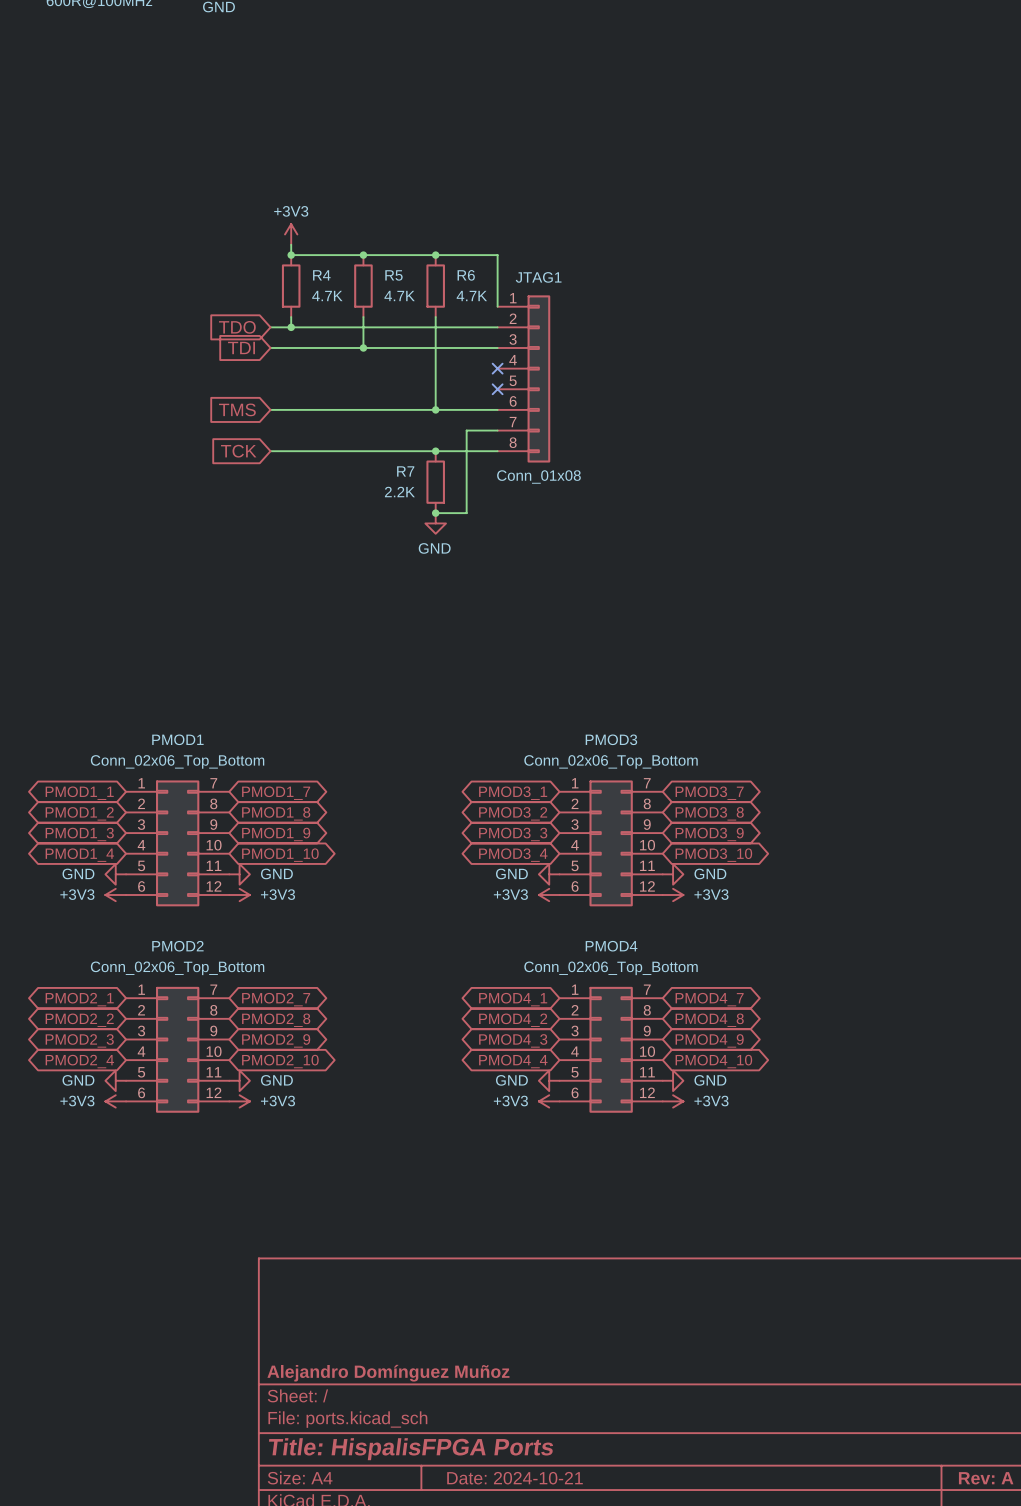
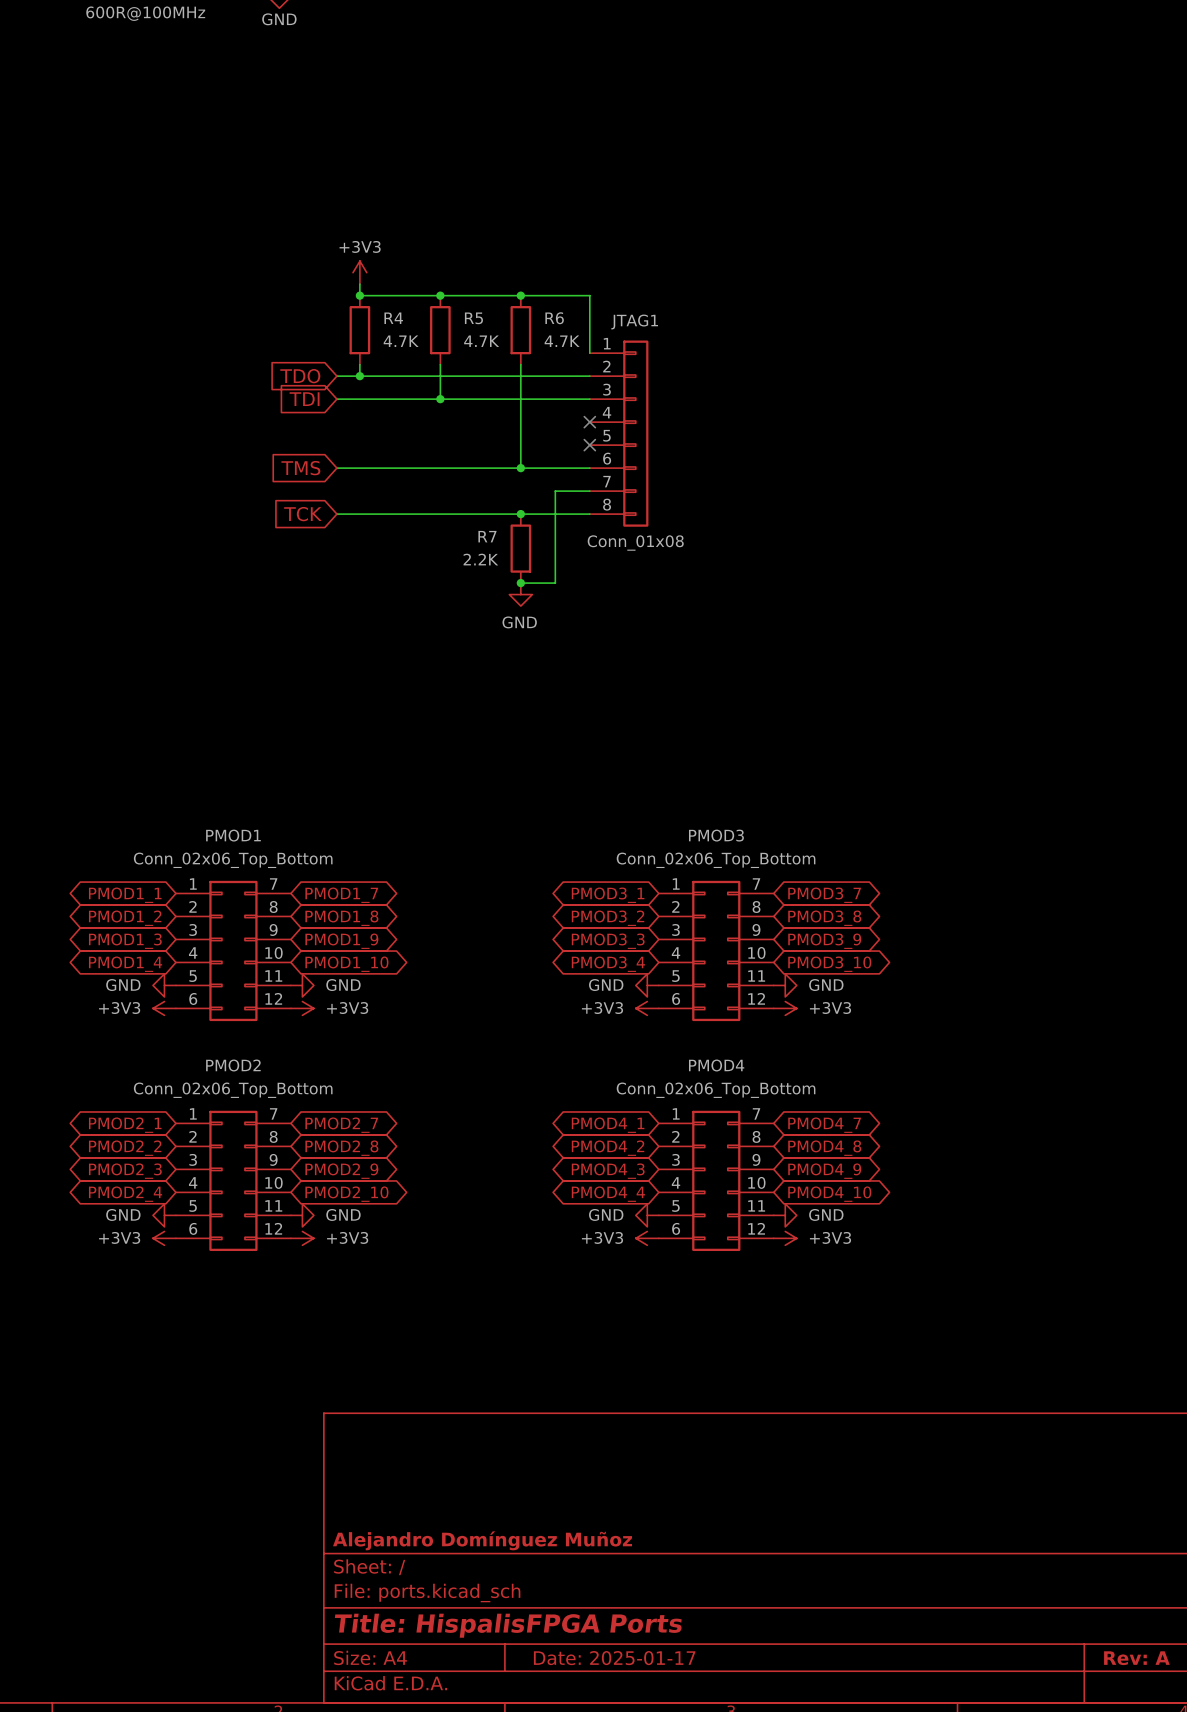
title block: Date: 2024-10-21 (515, 1478) -> Date: 2025-01-17 (614, 1658)

